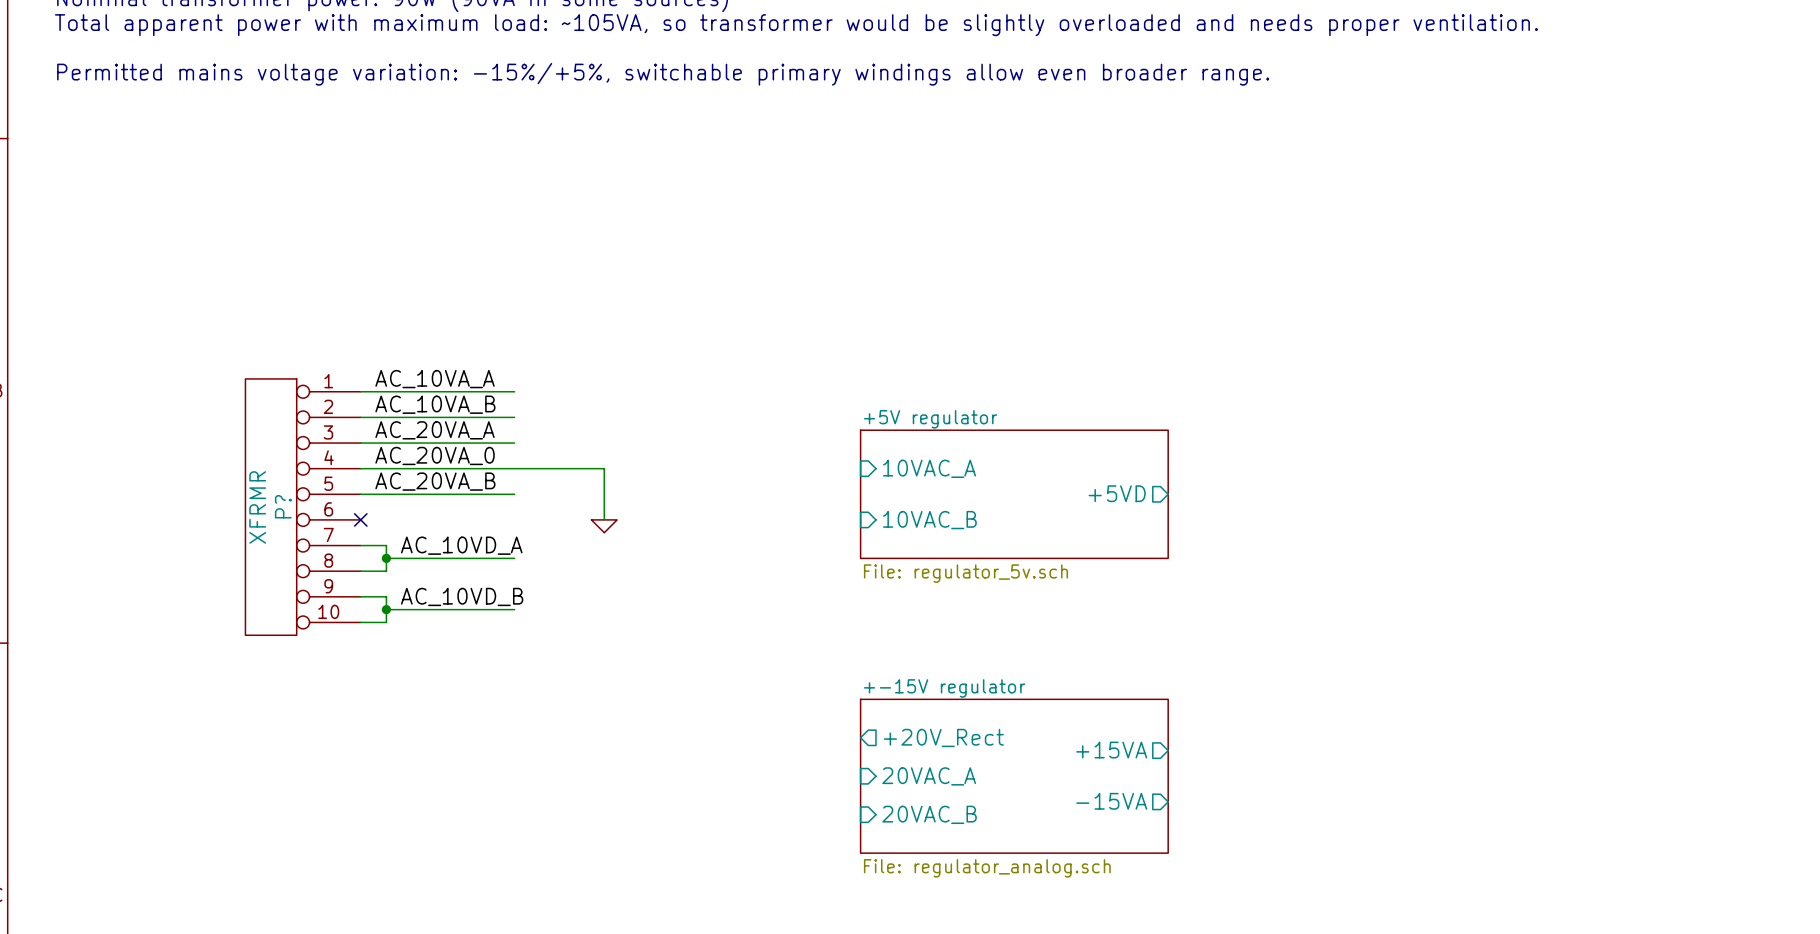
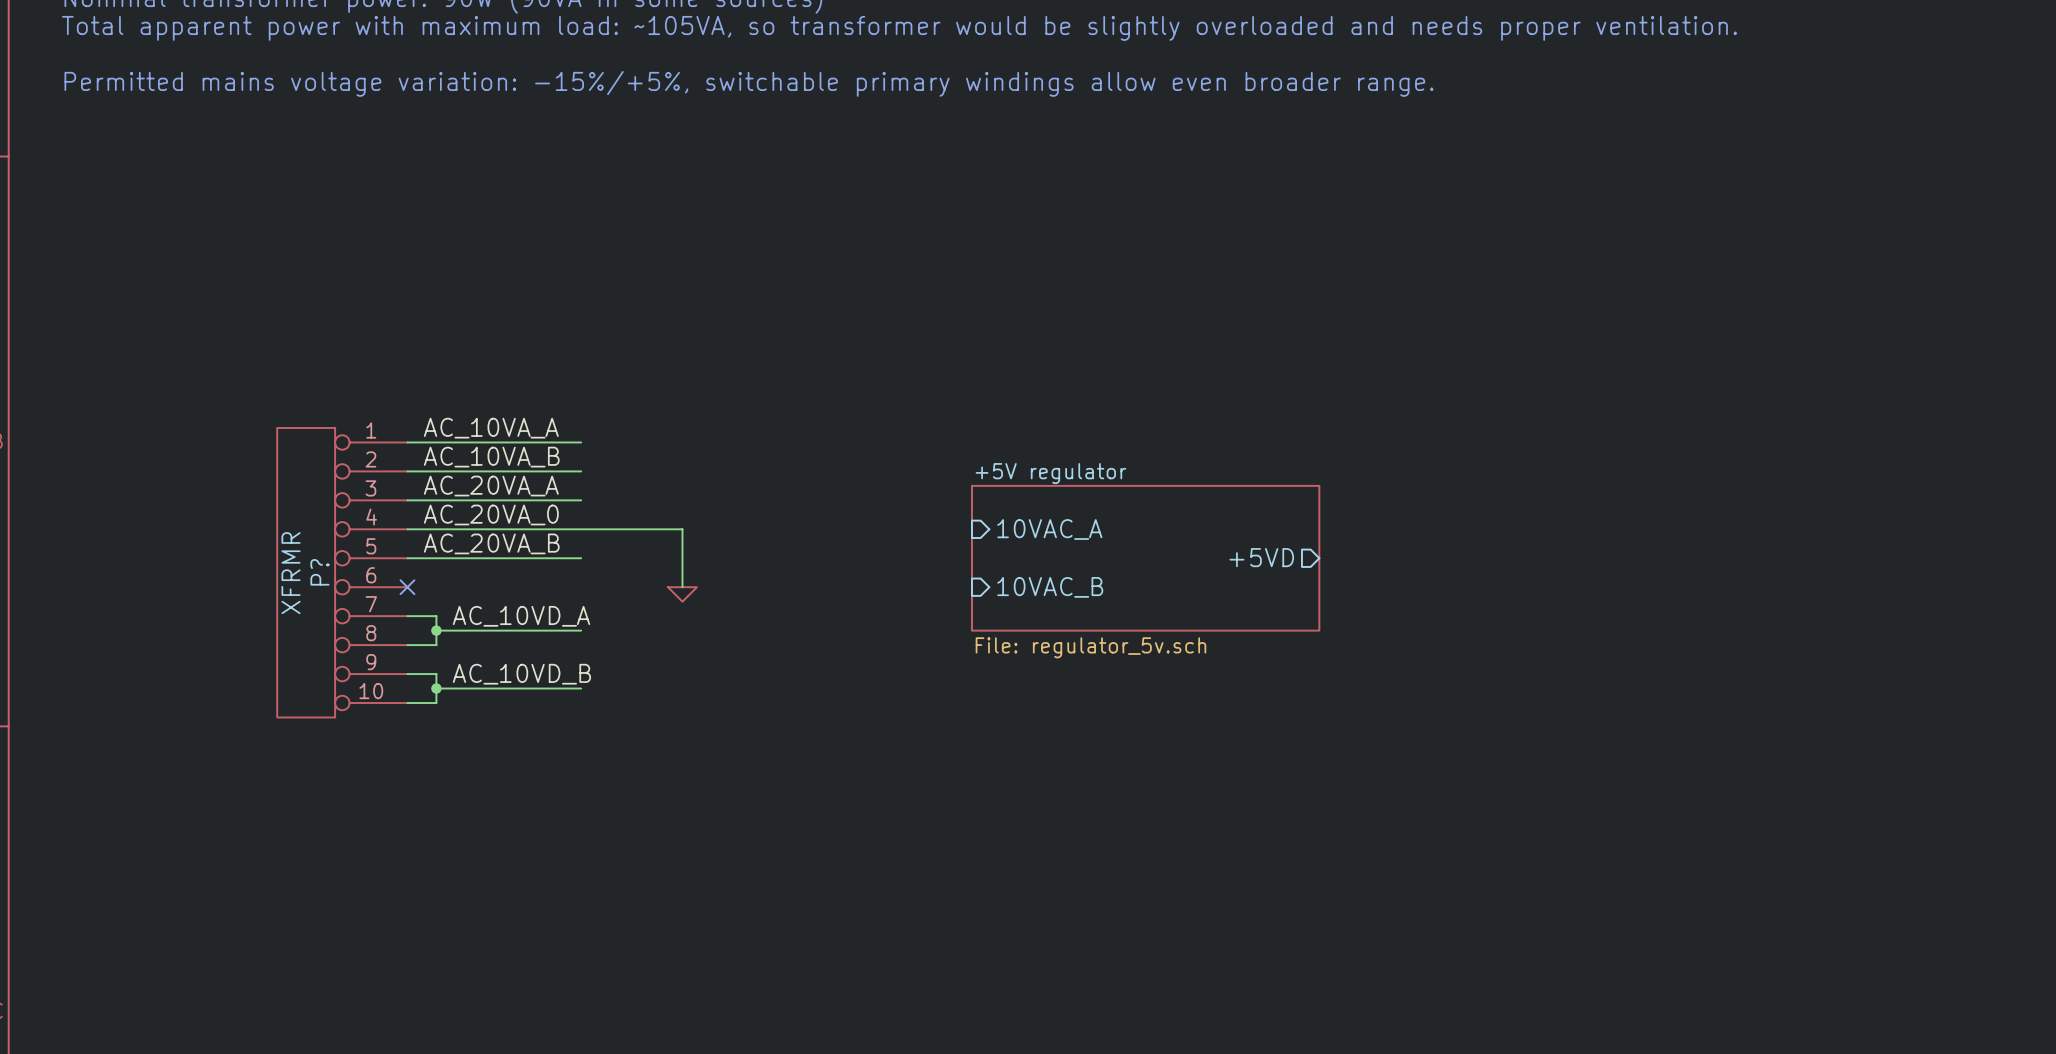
sheet pin: +20V_Rect (943, 737) -> none
sheet pin: +15VA (1111, 750) -> none
sheet pin: 20VAC_A (929, 776) -> none
sheet +-15V regulator: File: regulator_analog.sch (1014, 776) -> none
sheet pin: -15VA (1111, 801) -> none
sheet pin: 20VAC_B (929, 814) -> none

